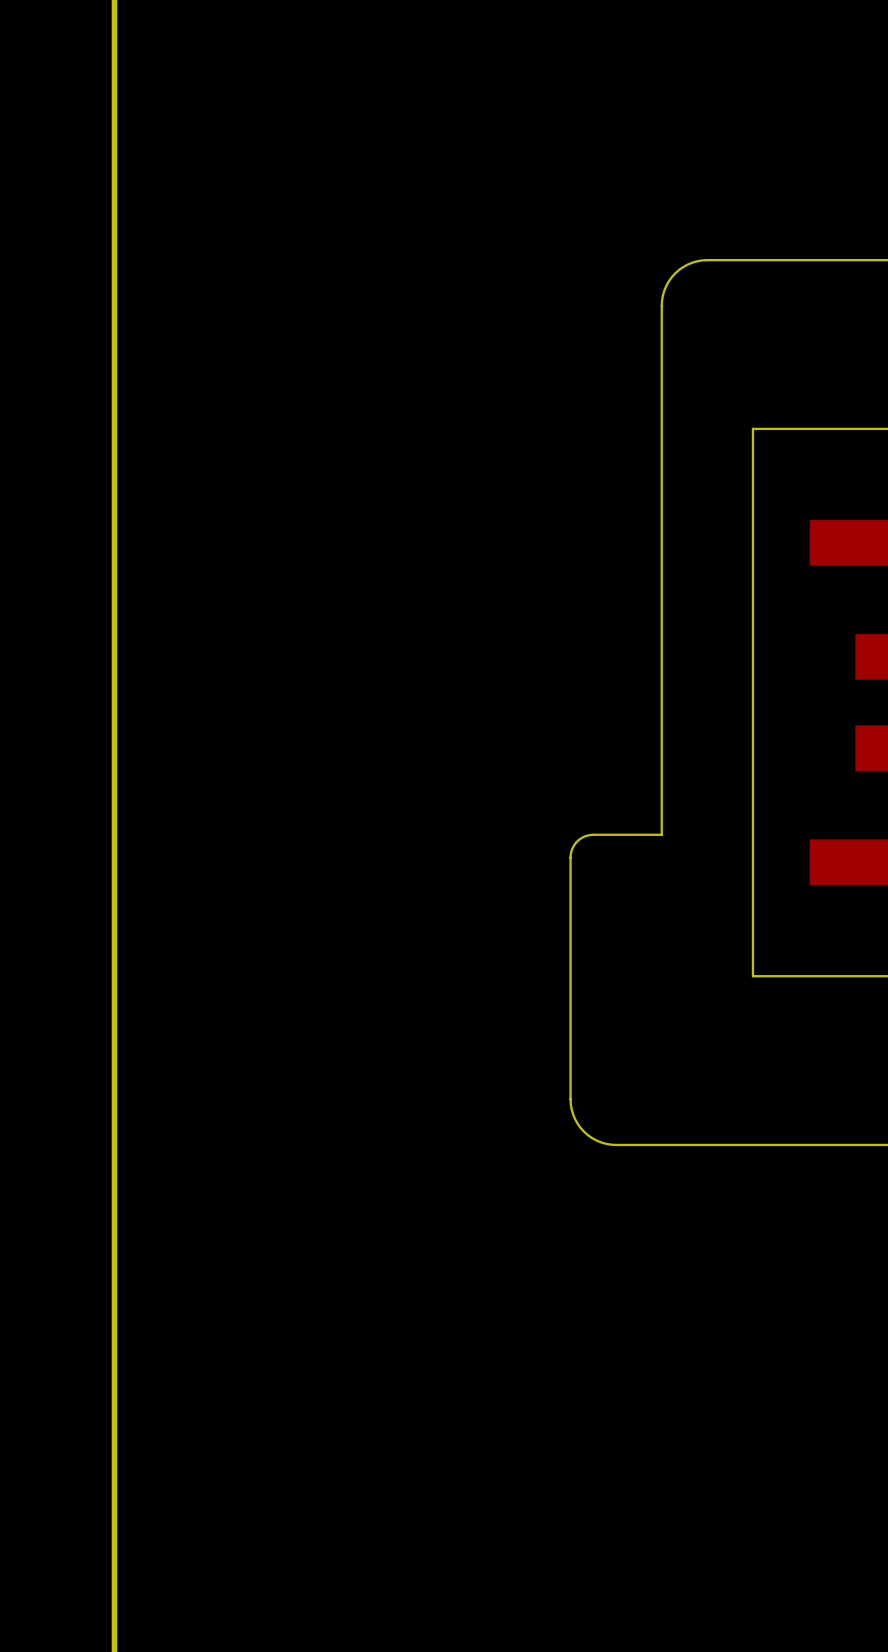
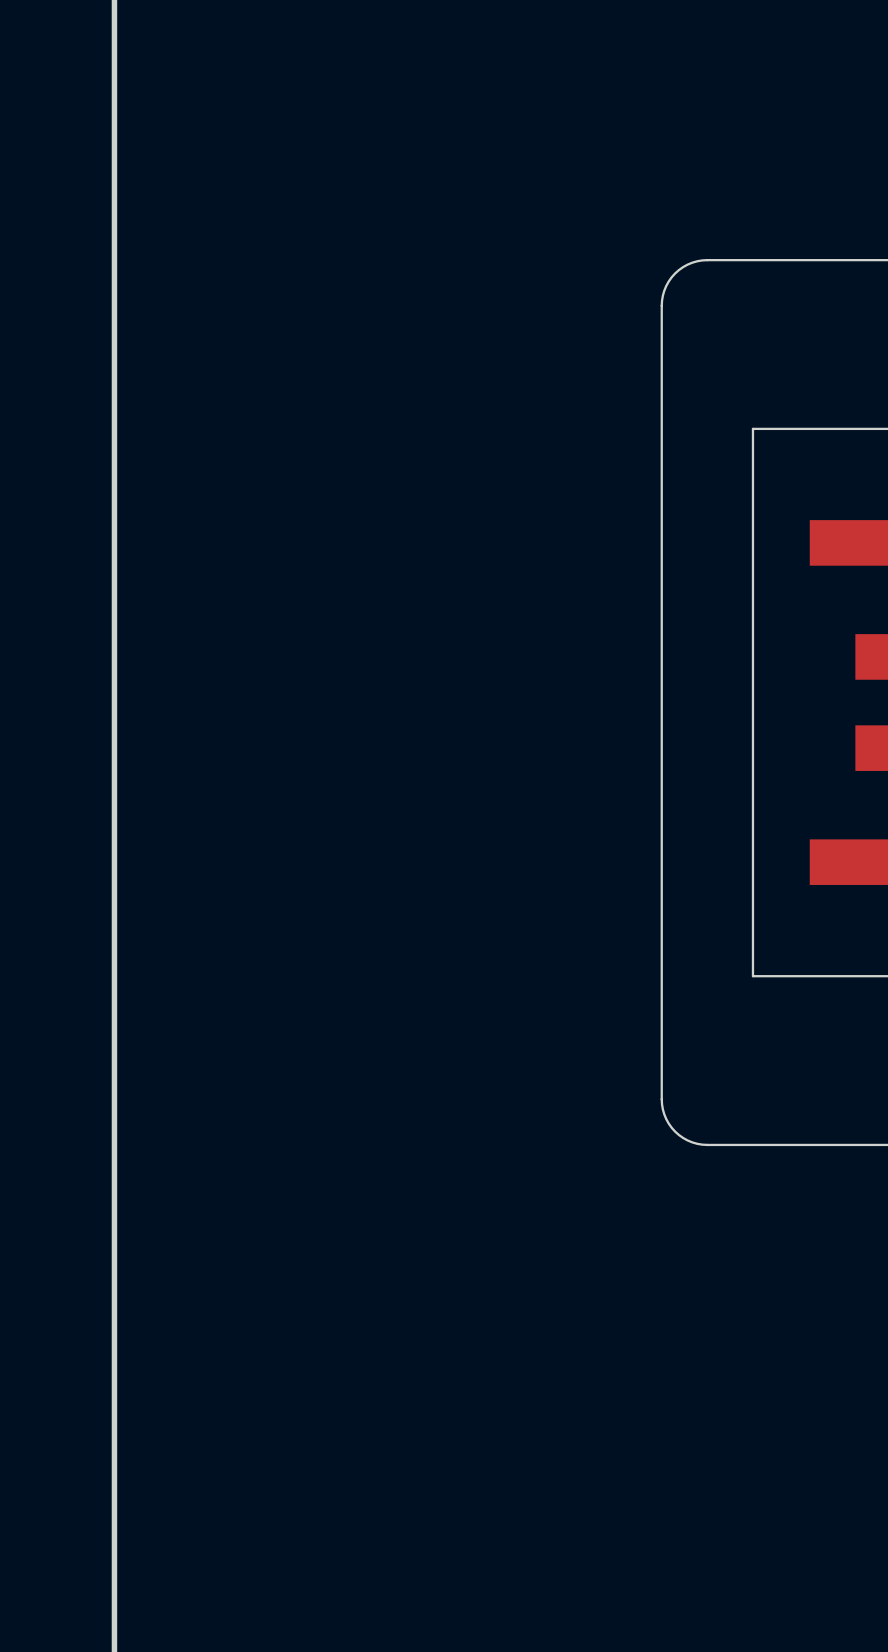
board edge: (661, 834) (590, 834) (579, 839) (571, 851) (570, 1104) (575, 1119) (580, 1127) (587, 1134) (601, 1142) (616, 1144) (707, 1144) -> (661, 834) (662, 1104) (666, 1119) (675, 1131) (687, 1140) (707, 1144)

